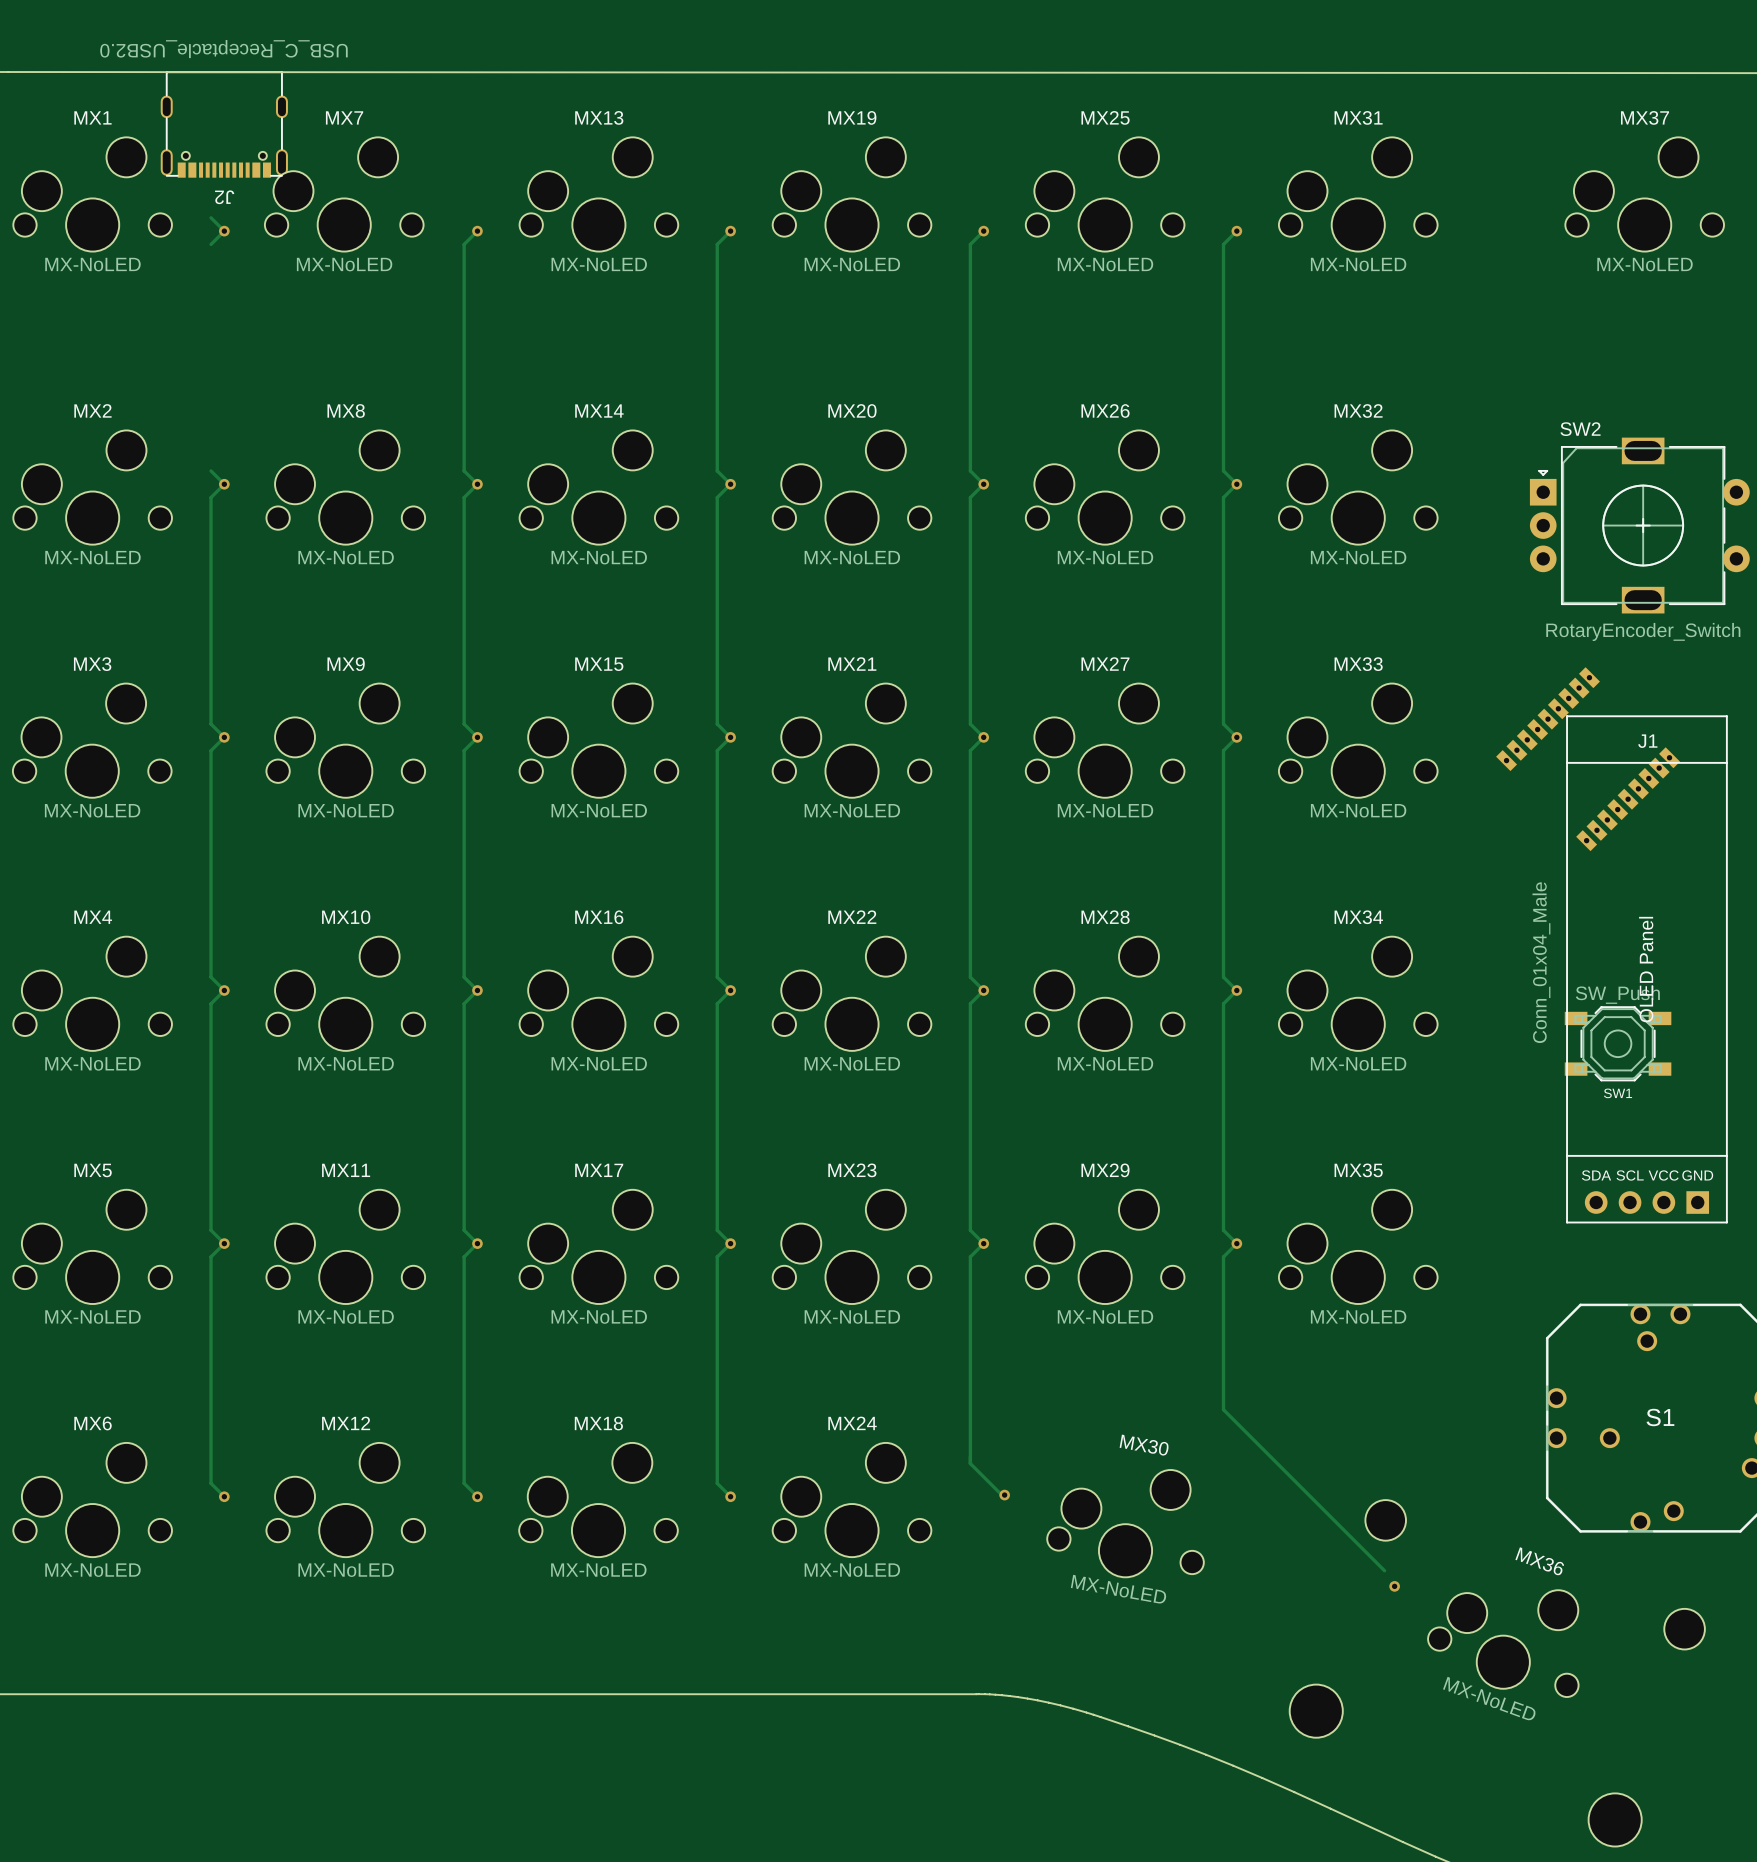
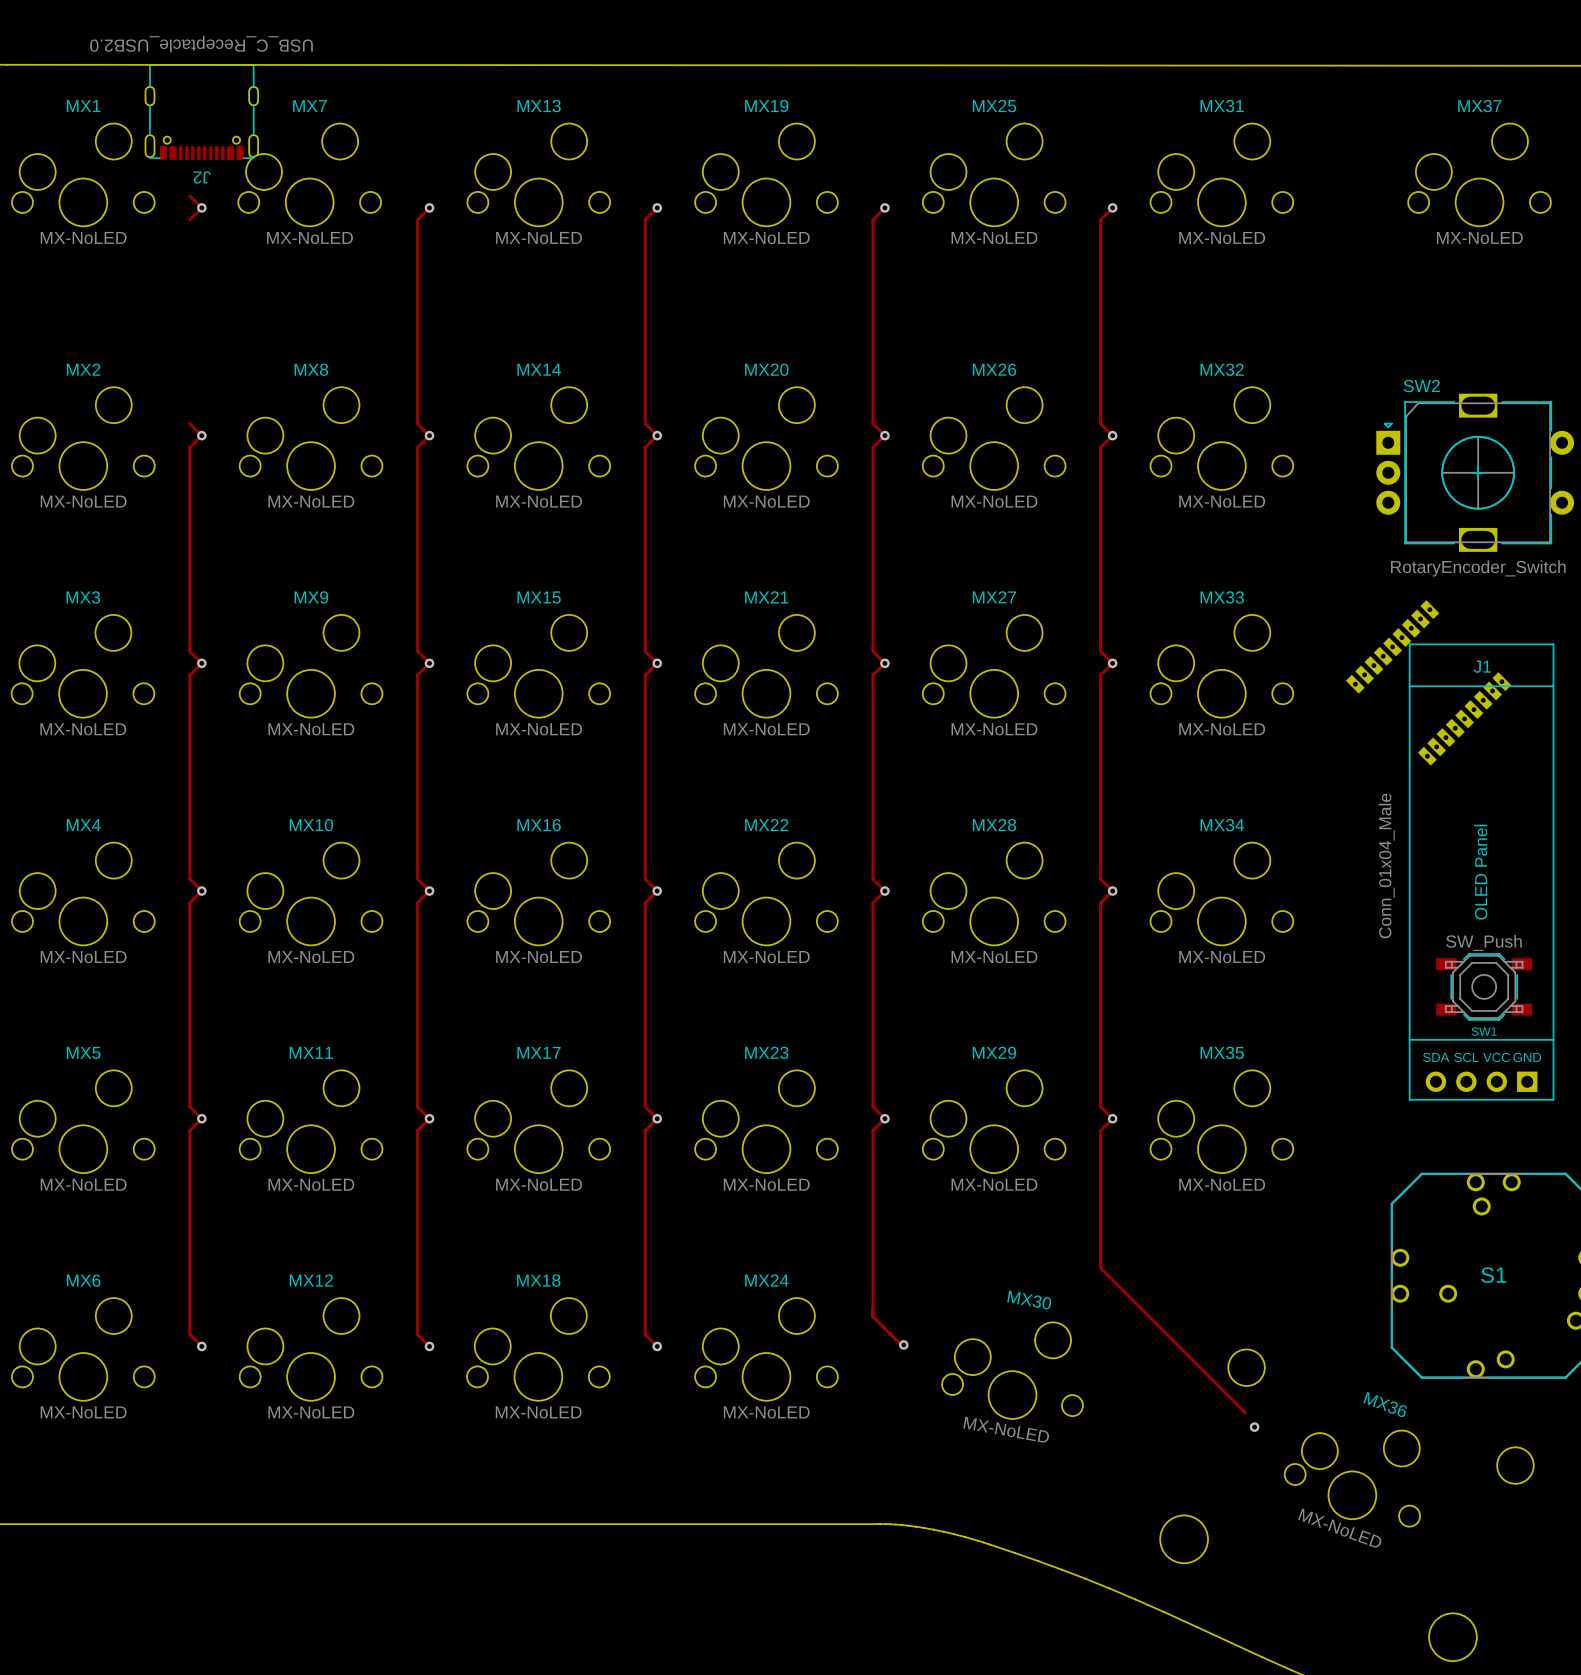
SW1 position: (1618, 1043) -> (1484, 986)

